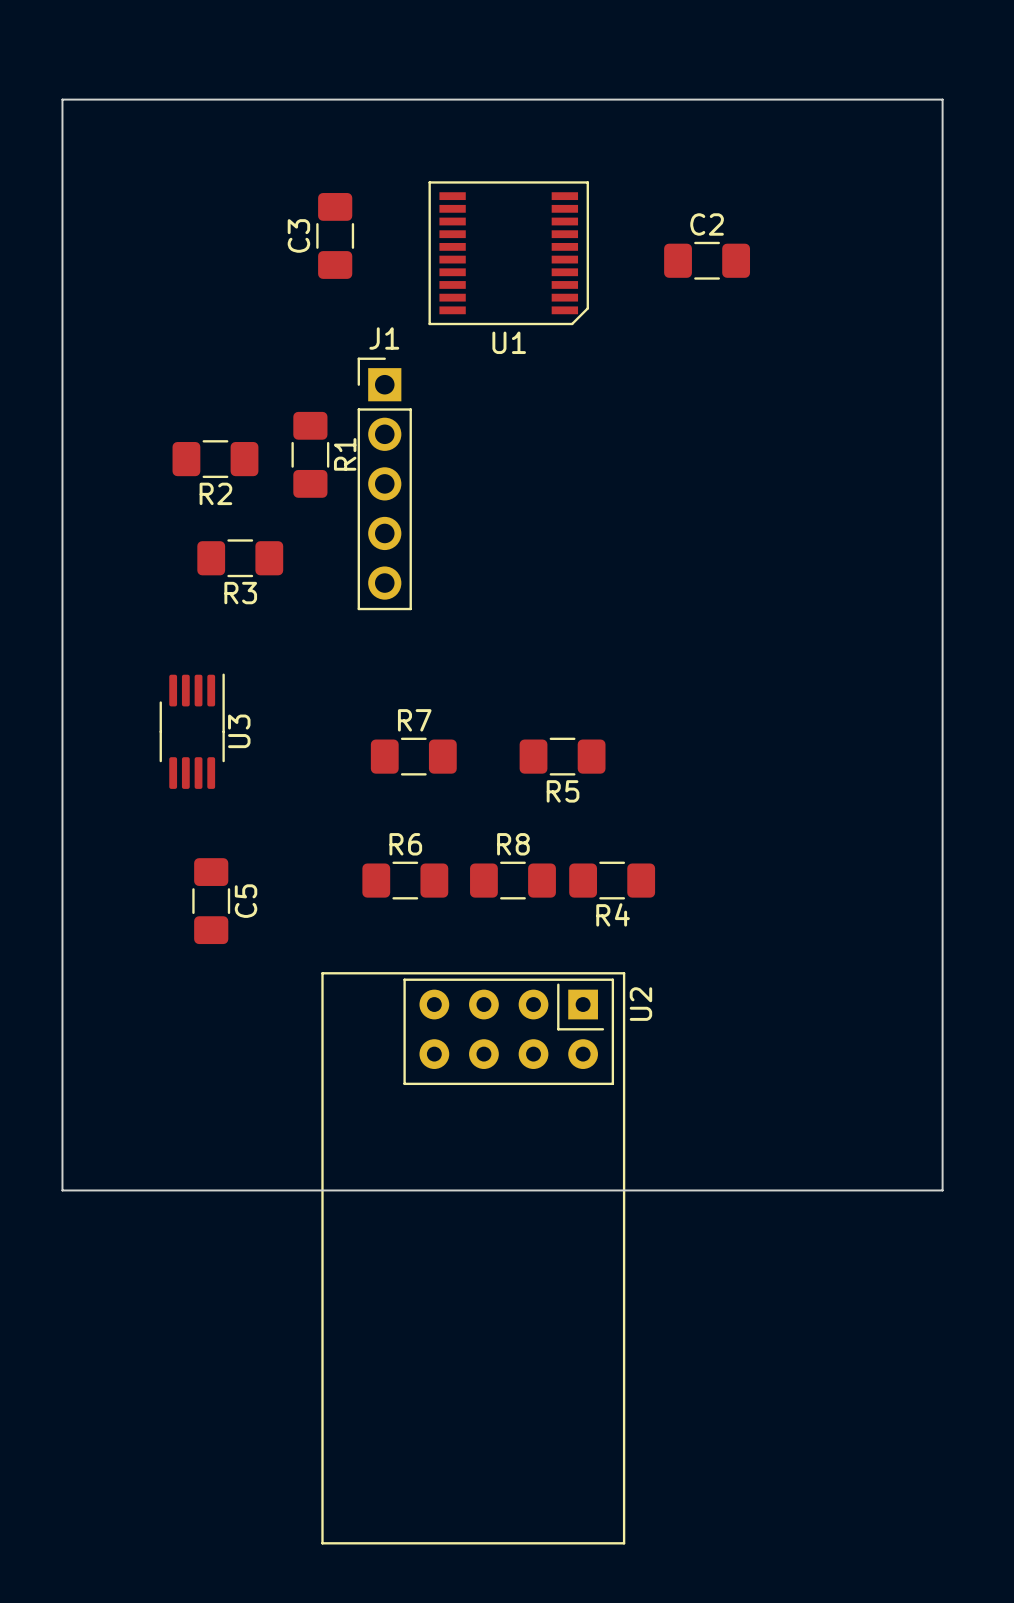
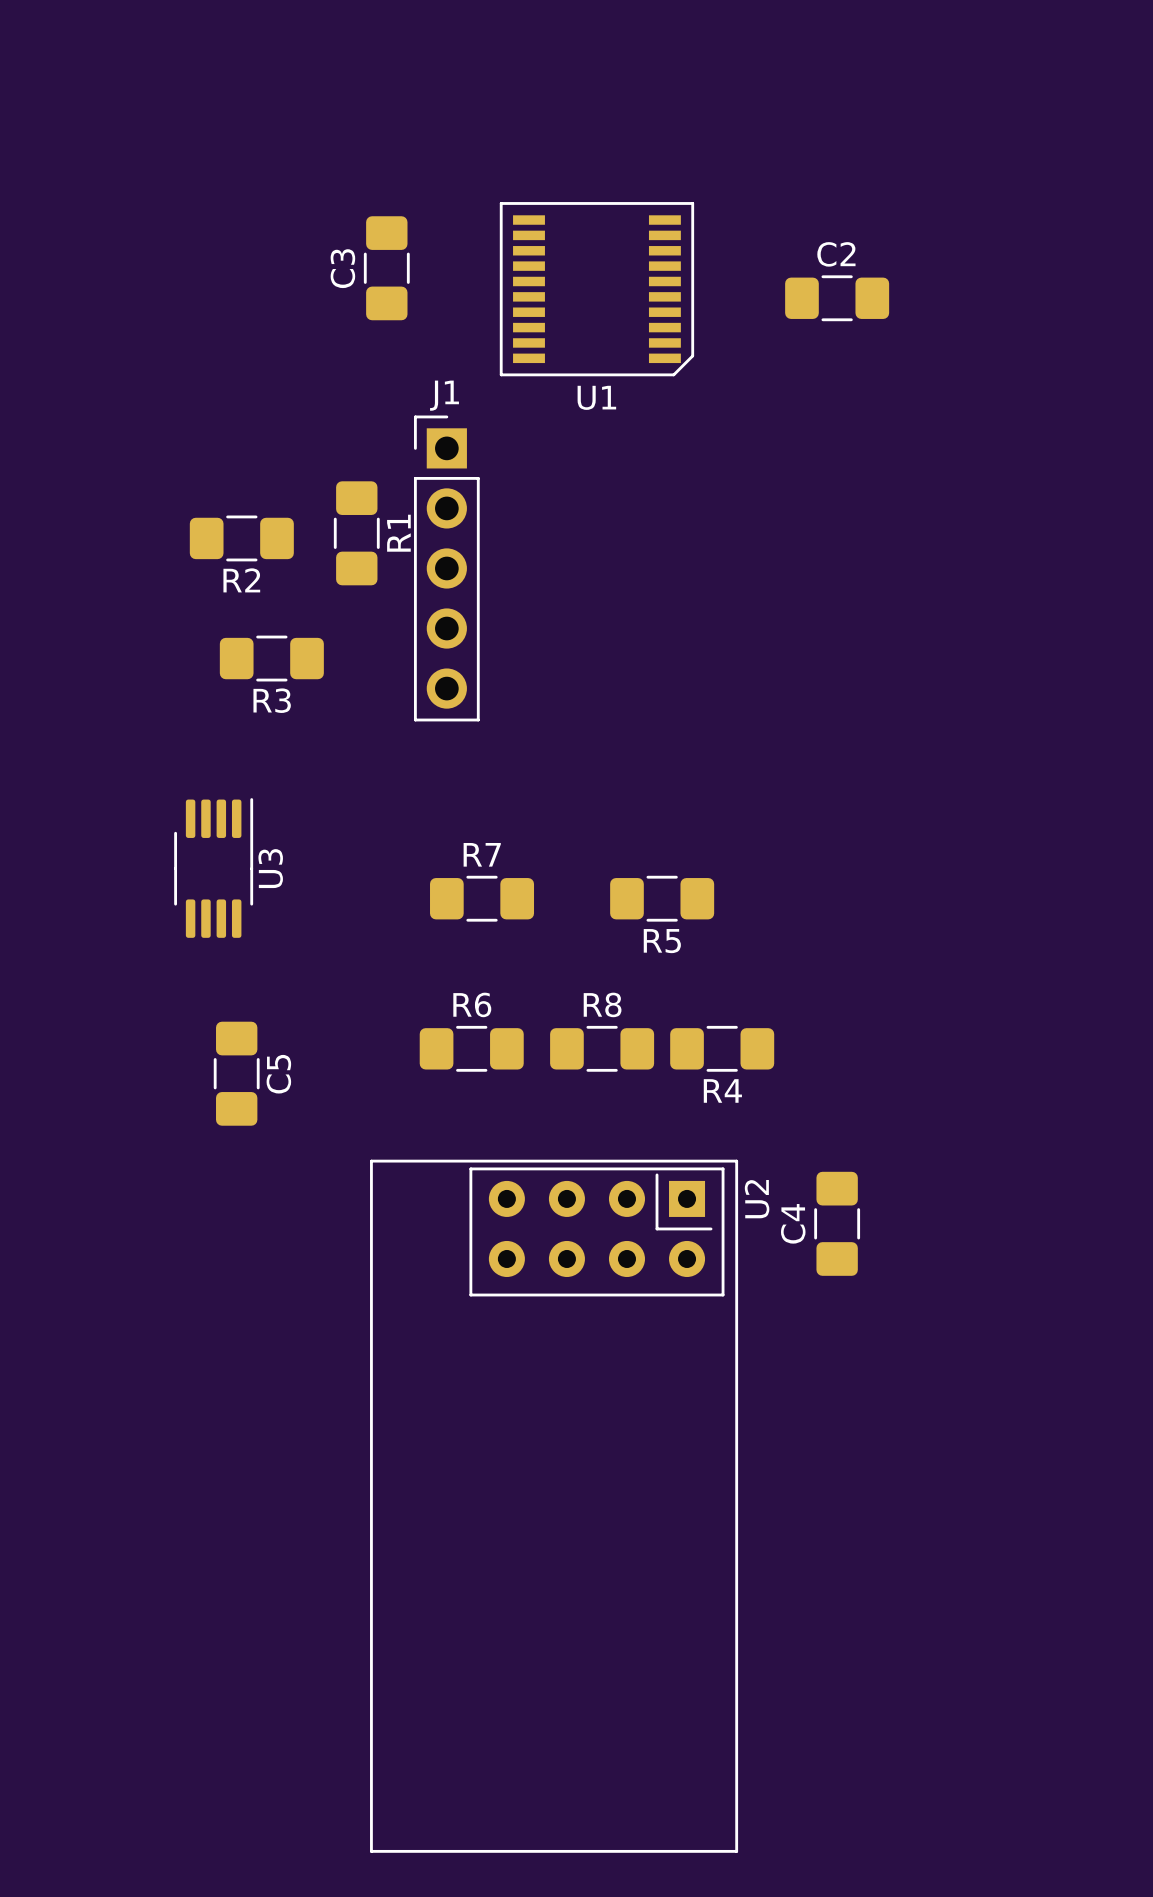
board edge: (62, 99) (942, 99) (942, 1190) (62, 1190) (62, 99) -> none
C4: none -> (837, 1223)

